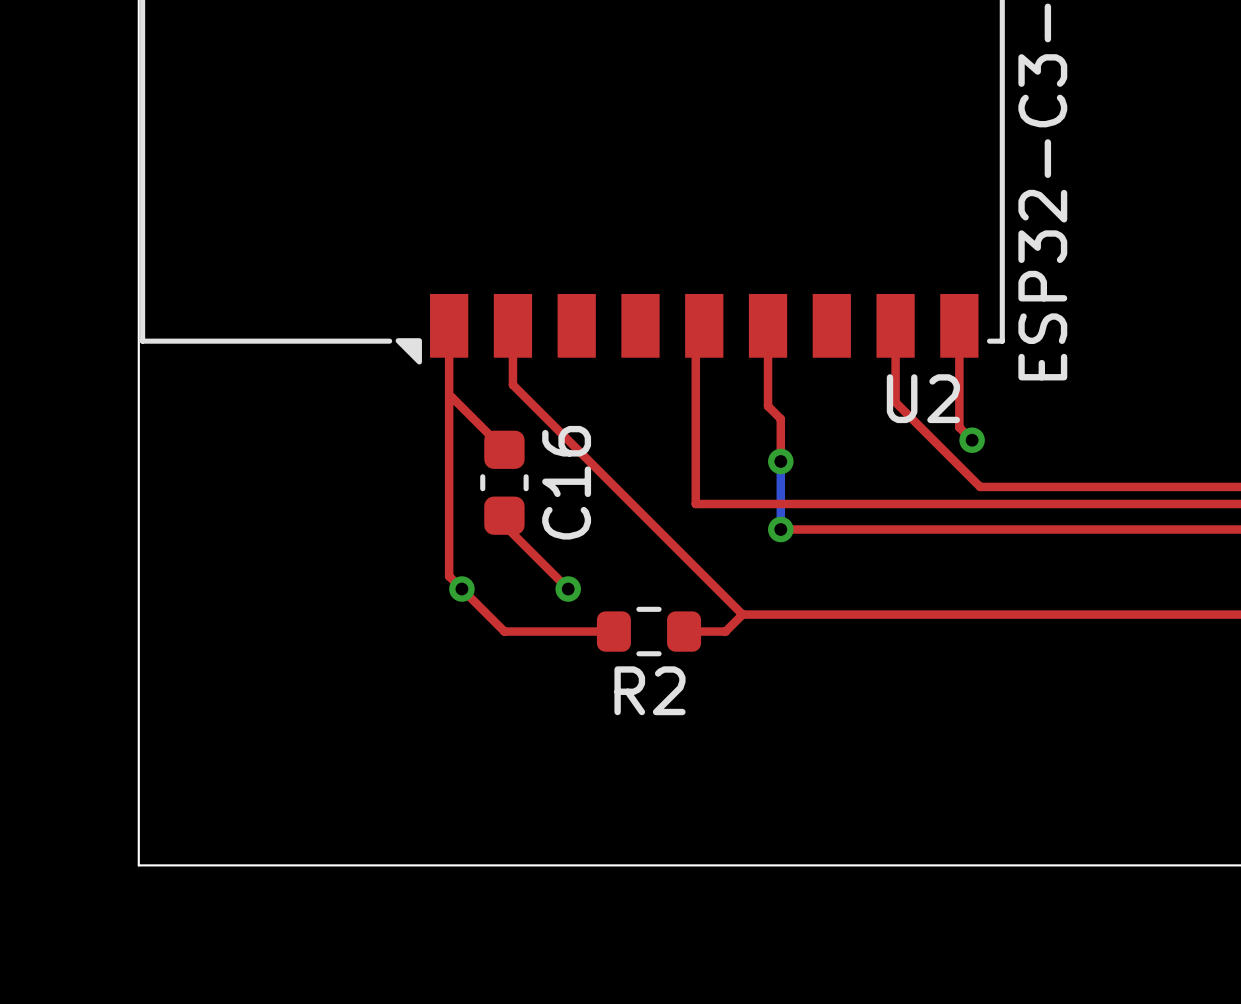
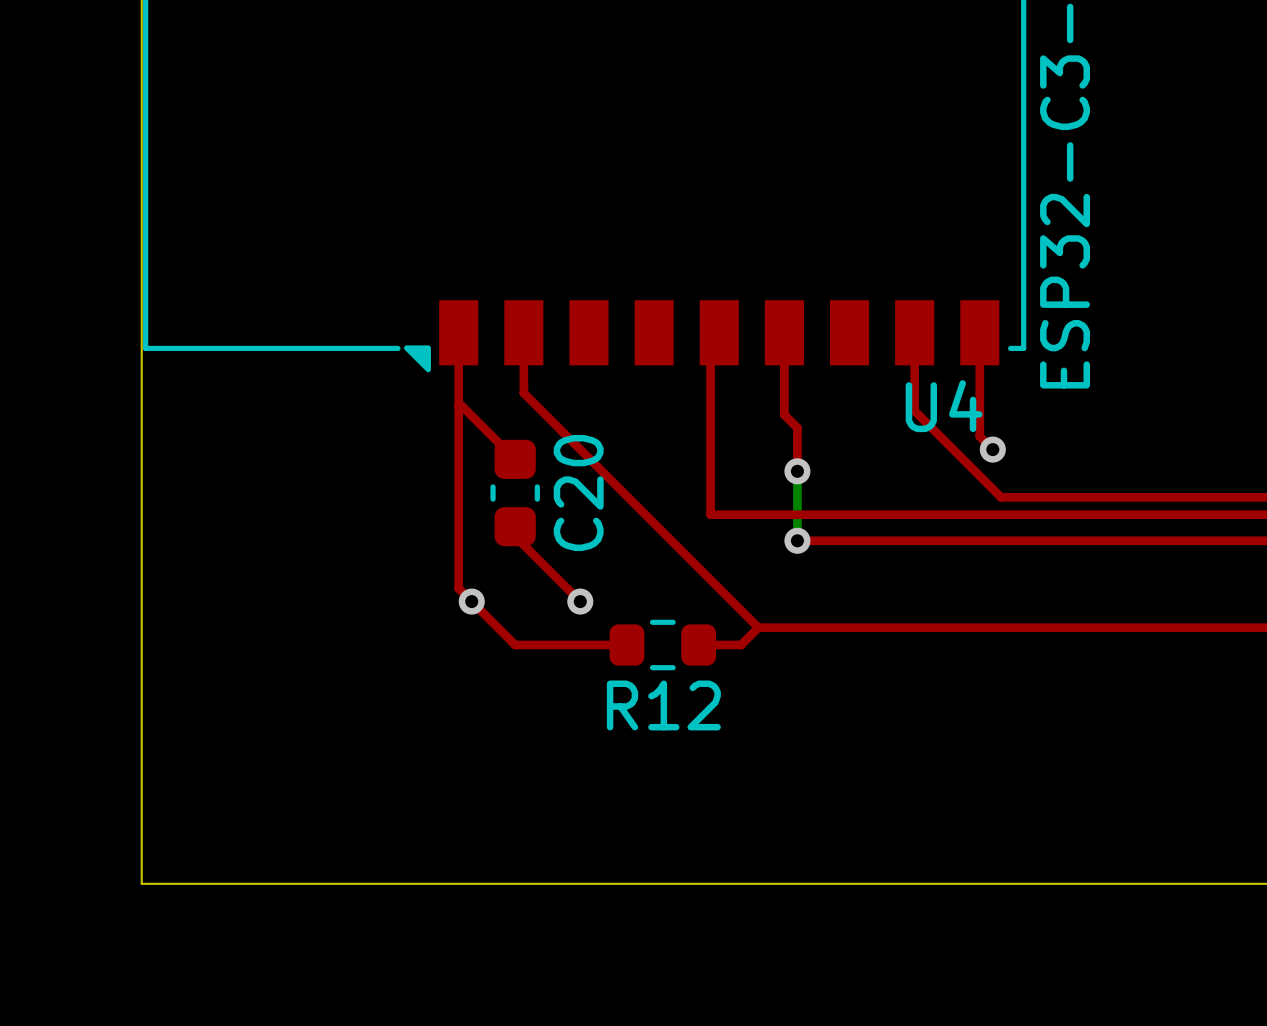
U2 name: U2 (923, 398) -> U4 (944, 406)
C16 name: C16 (566, 482) -> C20 (578, 493)
R2 name: R2 (650, 690) -> R12 (663, 705)

